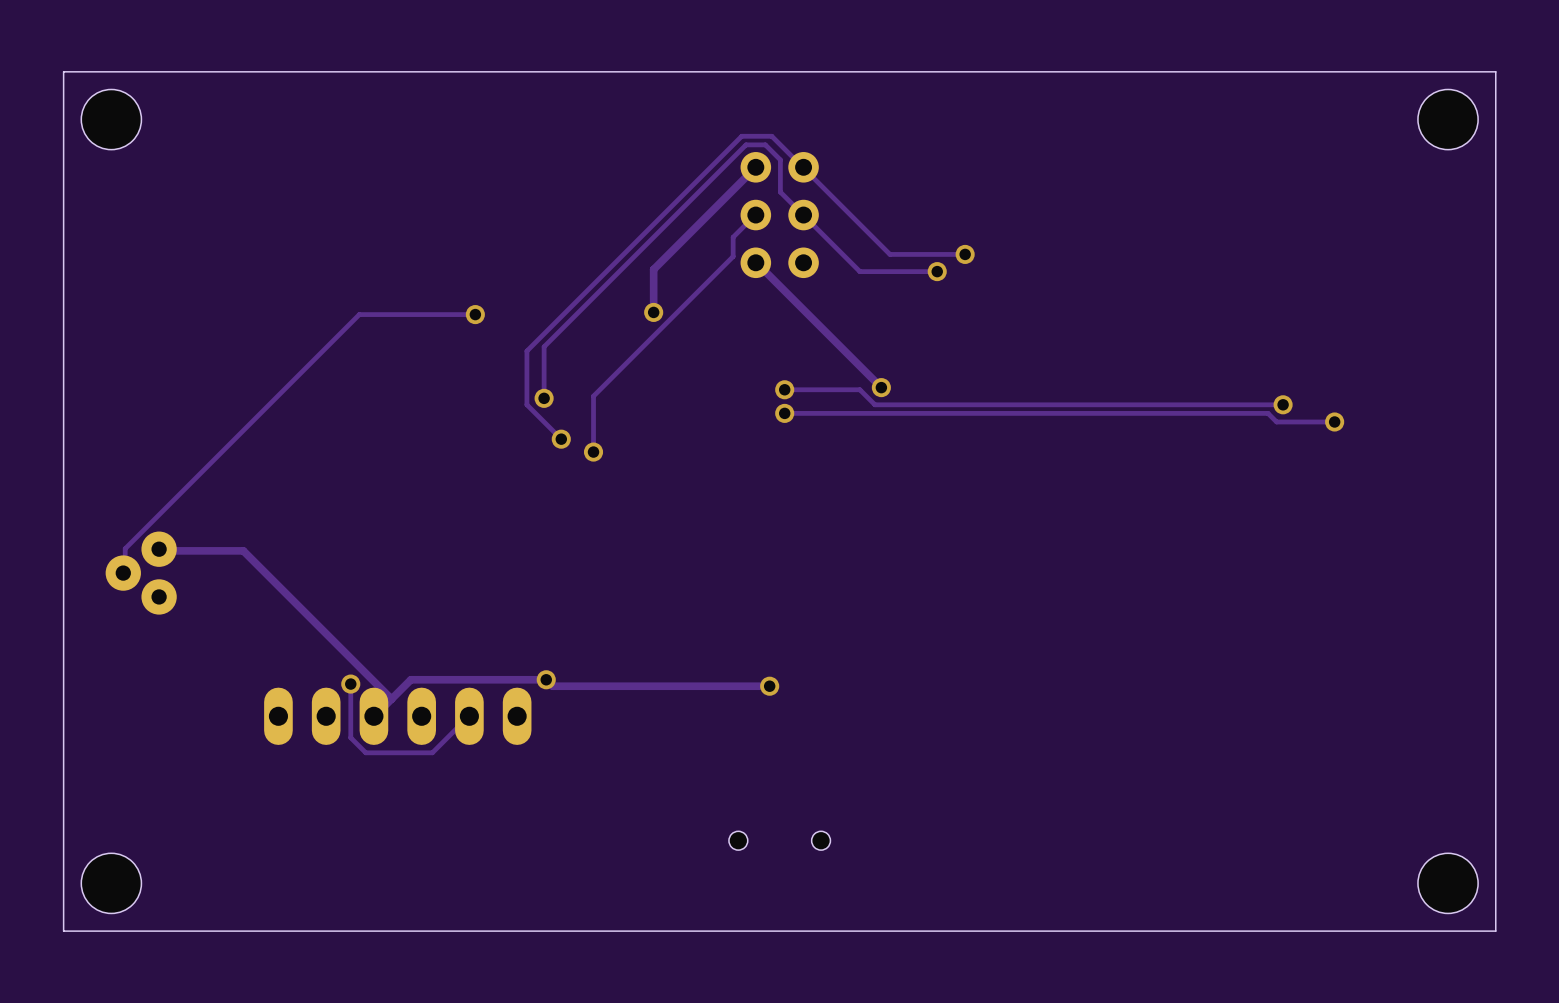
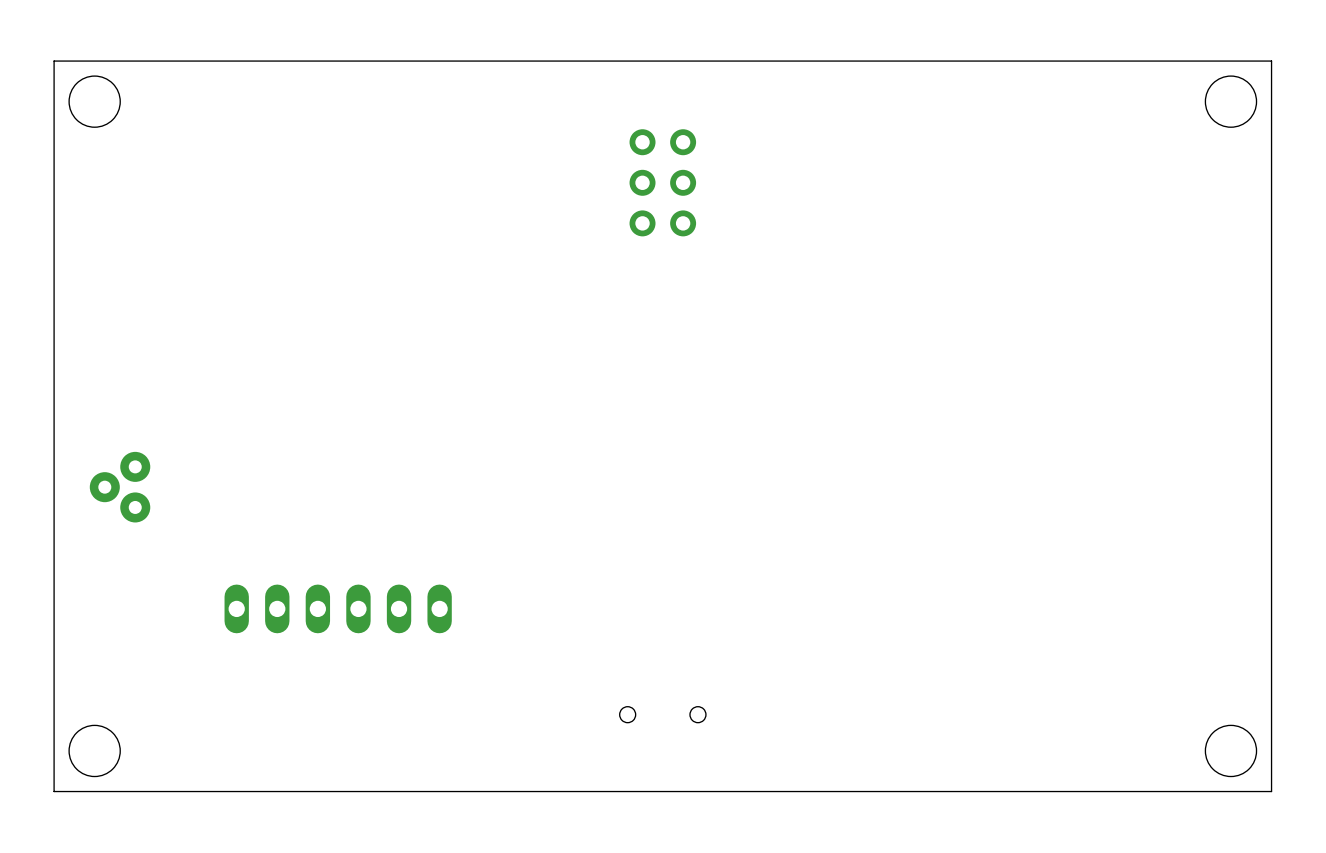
track: (755, 167) (653, 269) (653, 312) -> none
track: (755, 215) (733, 237) (733, 256) (593, 396) (593, 452) -> none
track: (965, 254) (889, 254) (771, 136) (741, 136) (526, 351) (526, 404) (561, 439) -> none
via: (965, 254) -> none
track: (755, 262) (881, 387) -> none
track: (937, 271) (859, 271) (780, 192) (780, 159) (765, 144) (746, 144) (544, 346) (544, 398) -> none
via: (937, 271) -> none
via: (653, 312) -> none
track: (475, 314) (359, 314) (125, 548) (125, 572) (123, 573) -> none
via: (475, 314) -> none
via: (881, 387) -> none
track: (784, 389) (859, 389) (874, 404) (1283, 404) -> none
via: (784, 389) -> none
via: (544, 398) -> none
via: (1283, 404) -> none
track: (784, 413) (1268, 413) (1276, 421) (1334, 421) -> none
via: (784, 413) -> none
via: (1334, 421) -> none
via: (561, 439) -> none
via: (593, 452) -> none
track: (159, 549) (159, 550) (243, 550) (391, 699) -> none
via: (546, 679) -> none
track: (350, 684) (350, 737) (365, 752) (432, 752) (469, 716) -> none
via: (350, 684) -> none
track: (769, 686) (552, 686) (546, 679) (410, 679) (373, 716) -> none
via: (769, 686) -> none

